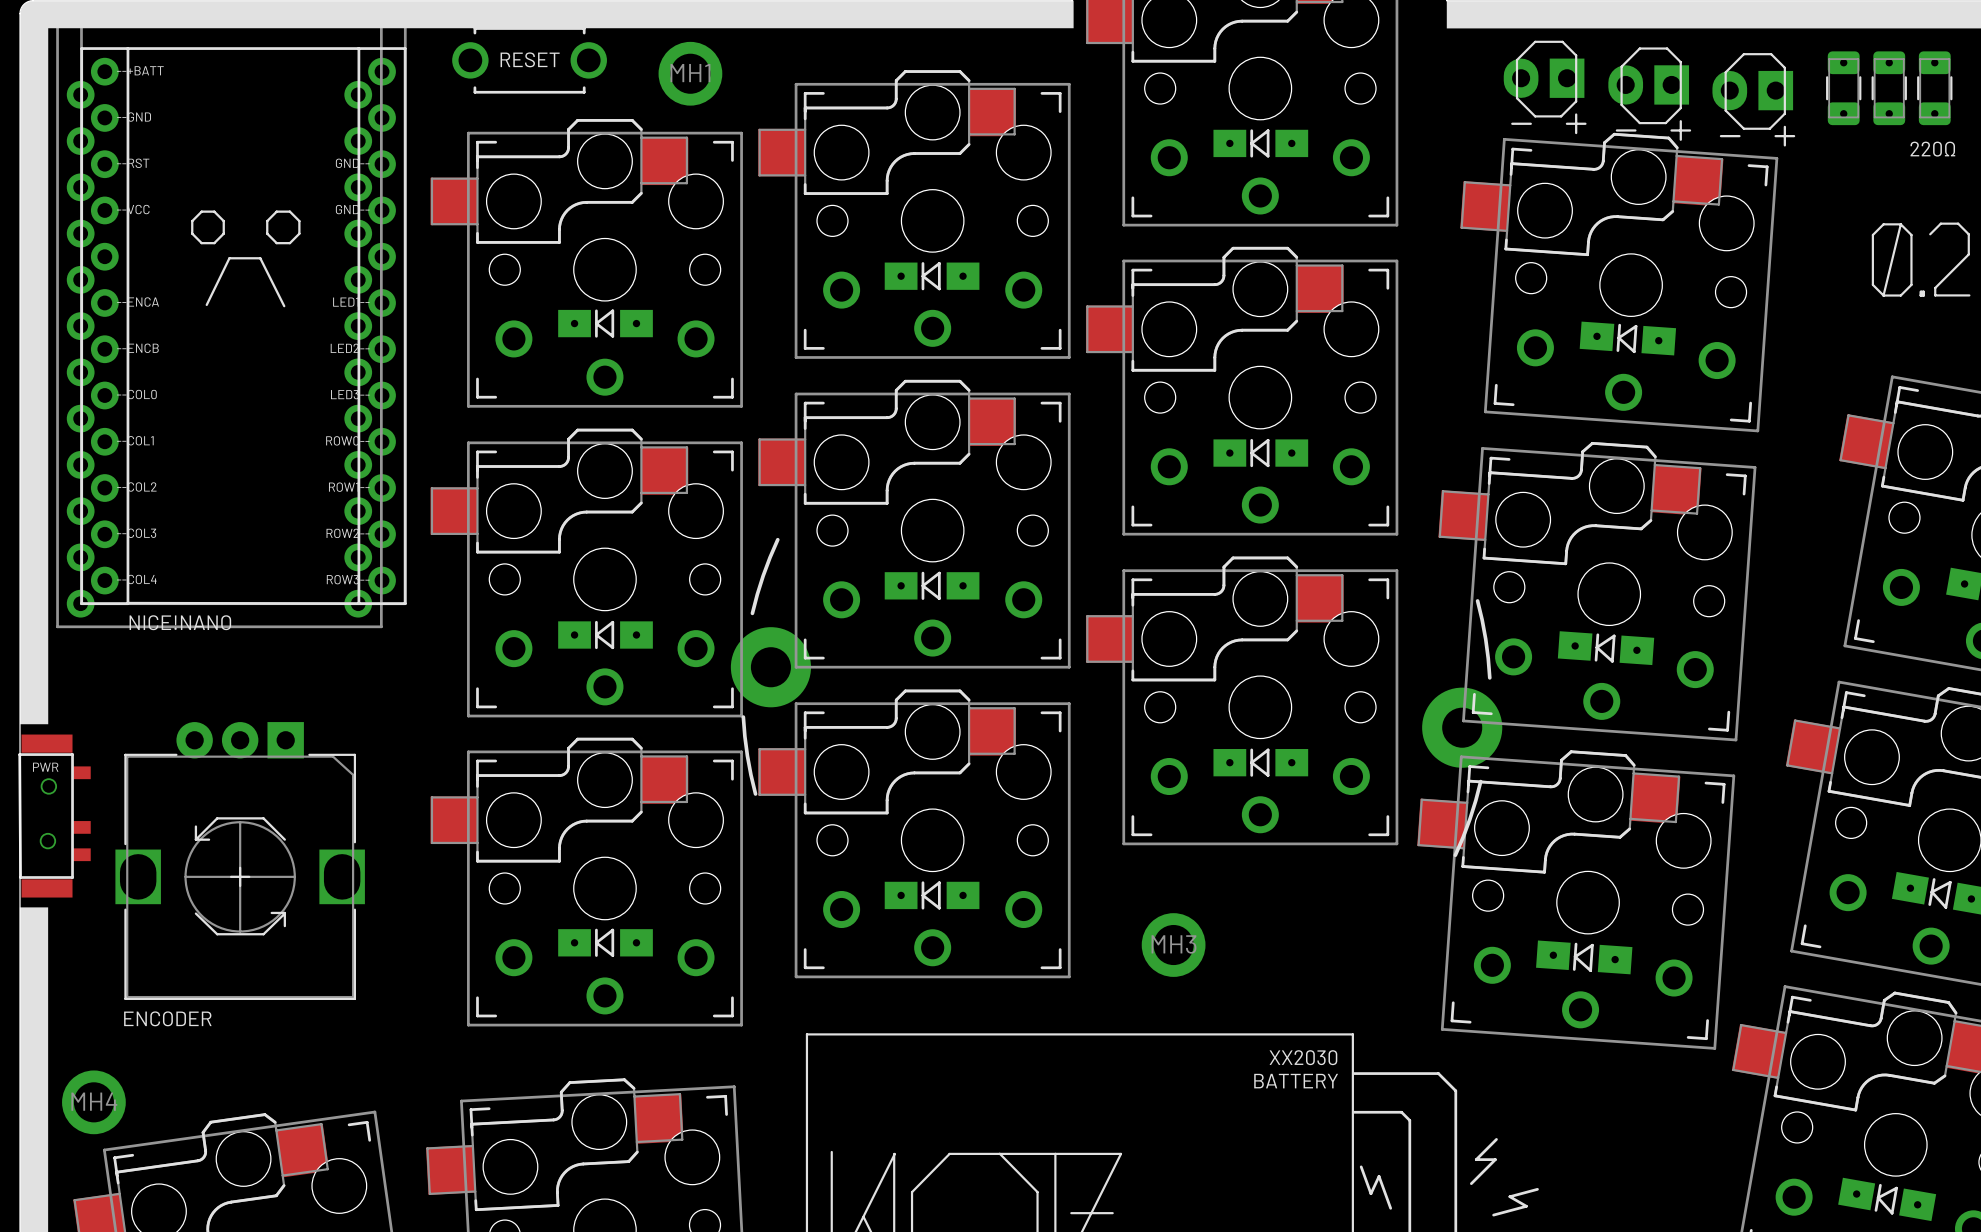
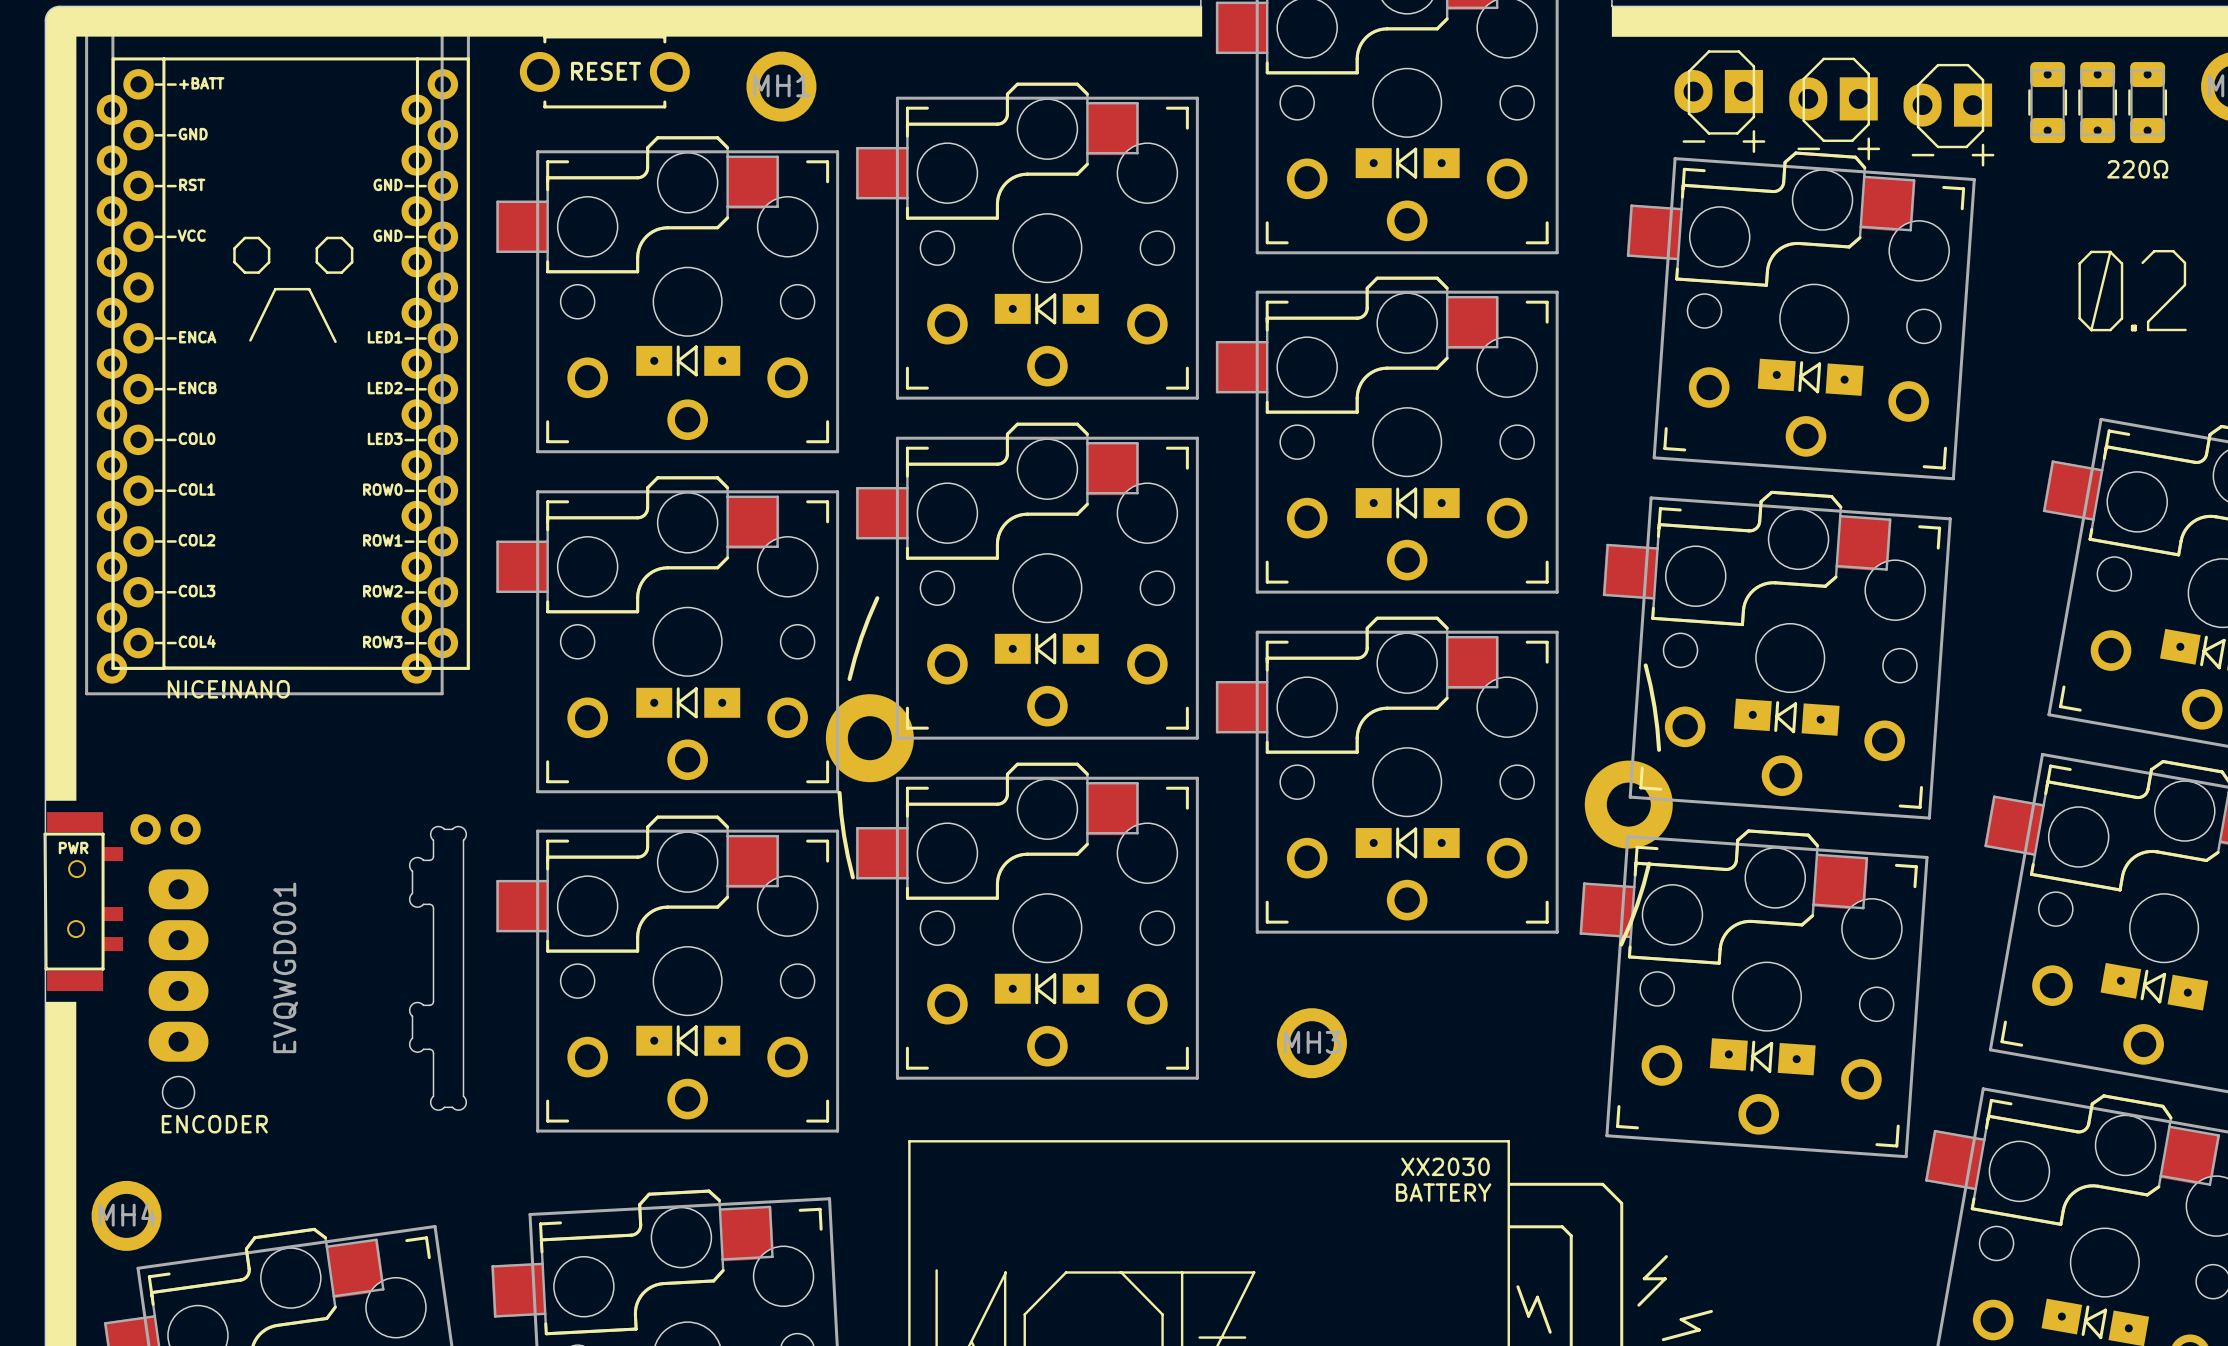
part footprint: [115, 722, 365, 1000] -> [130, 814, 467, 1111]
part value: none -> EVQWGD001 (285, 967)

